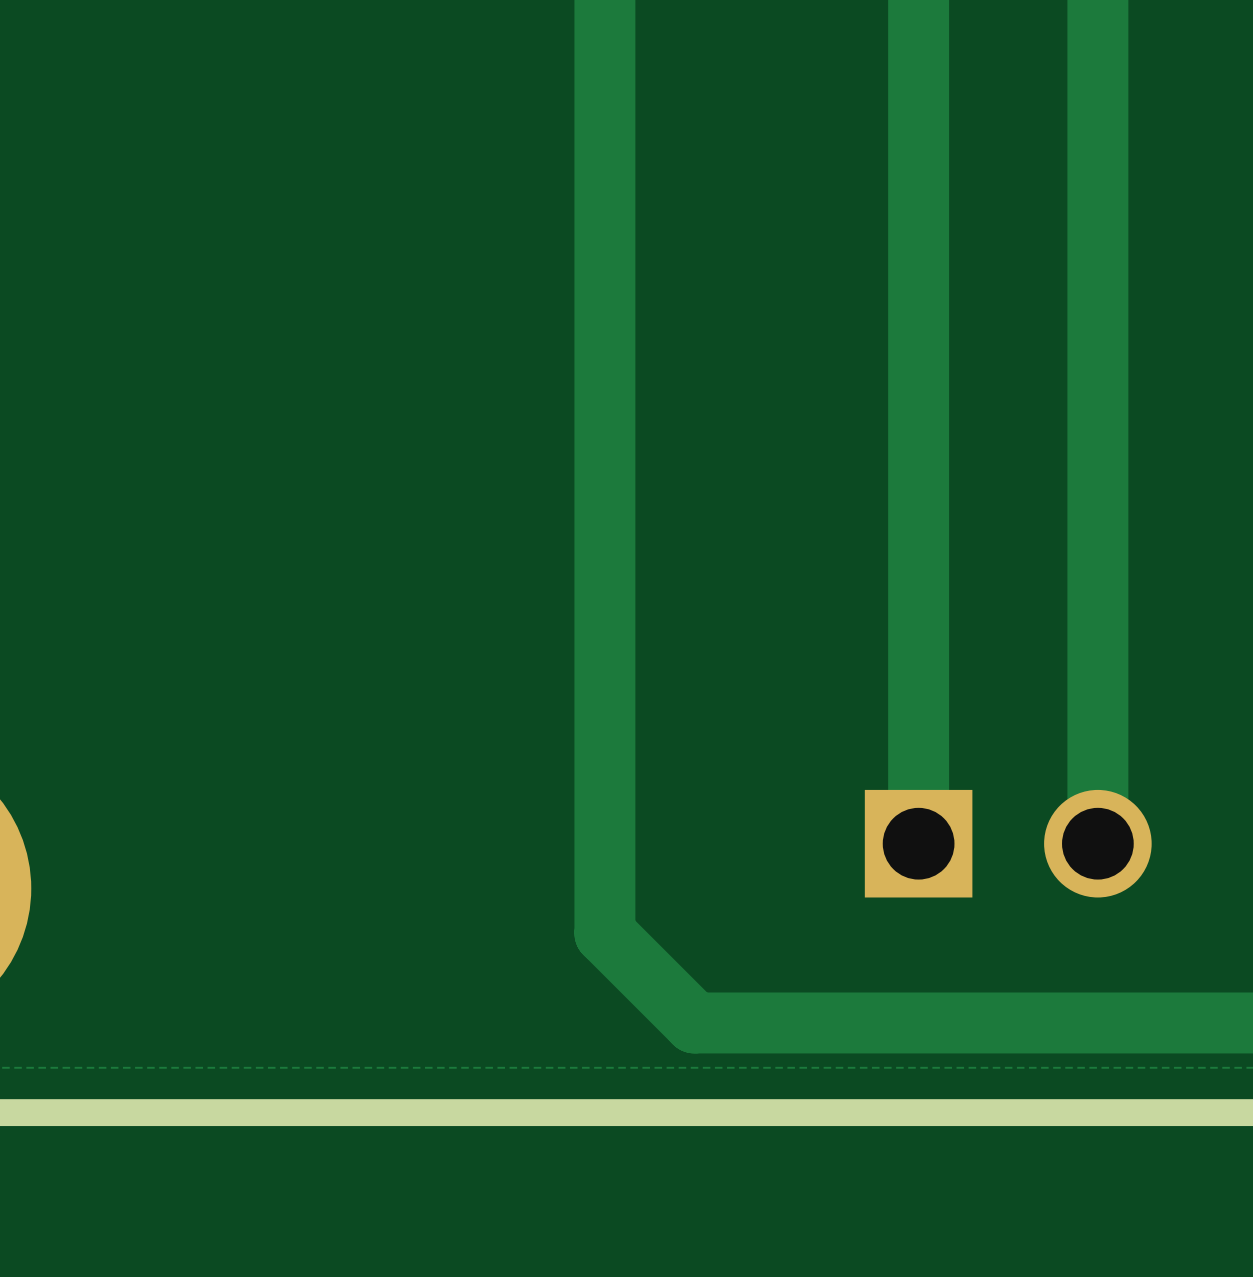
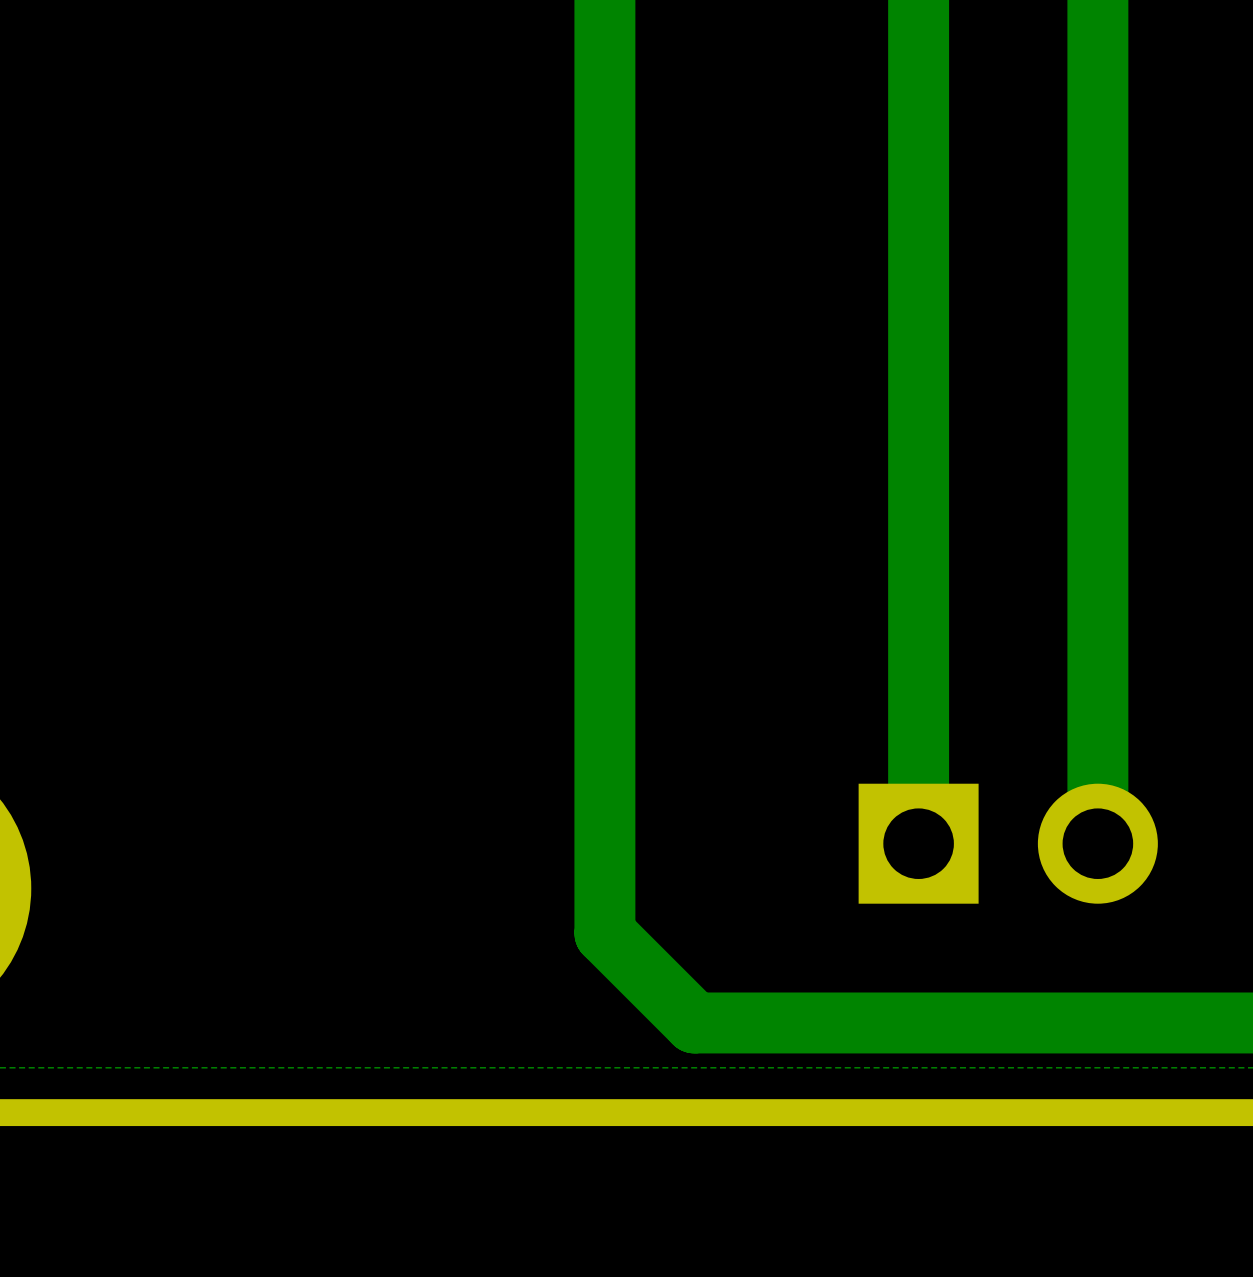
part footprint: [864, 789, 1152, 898] -> [858, 783, 1158, 904]

